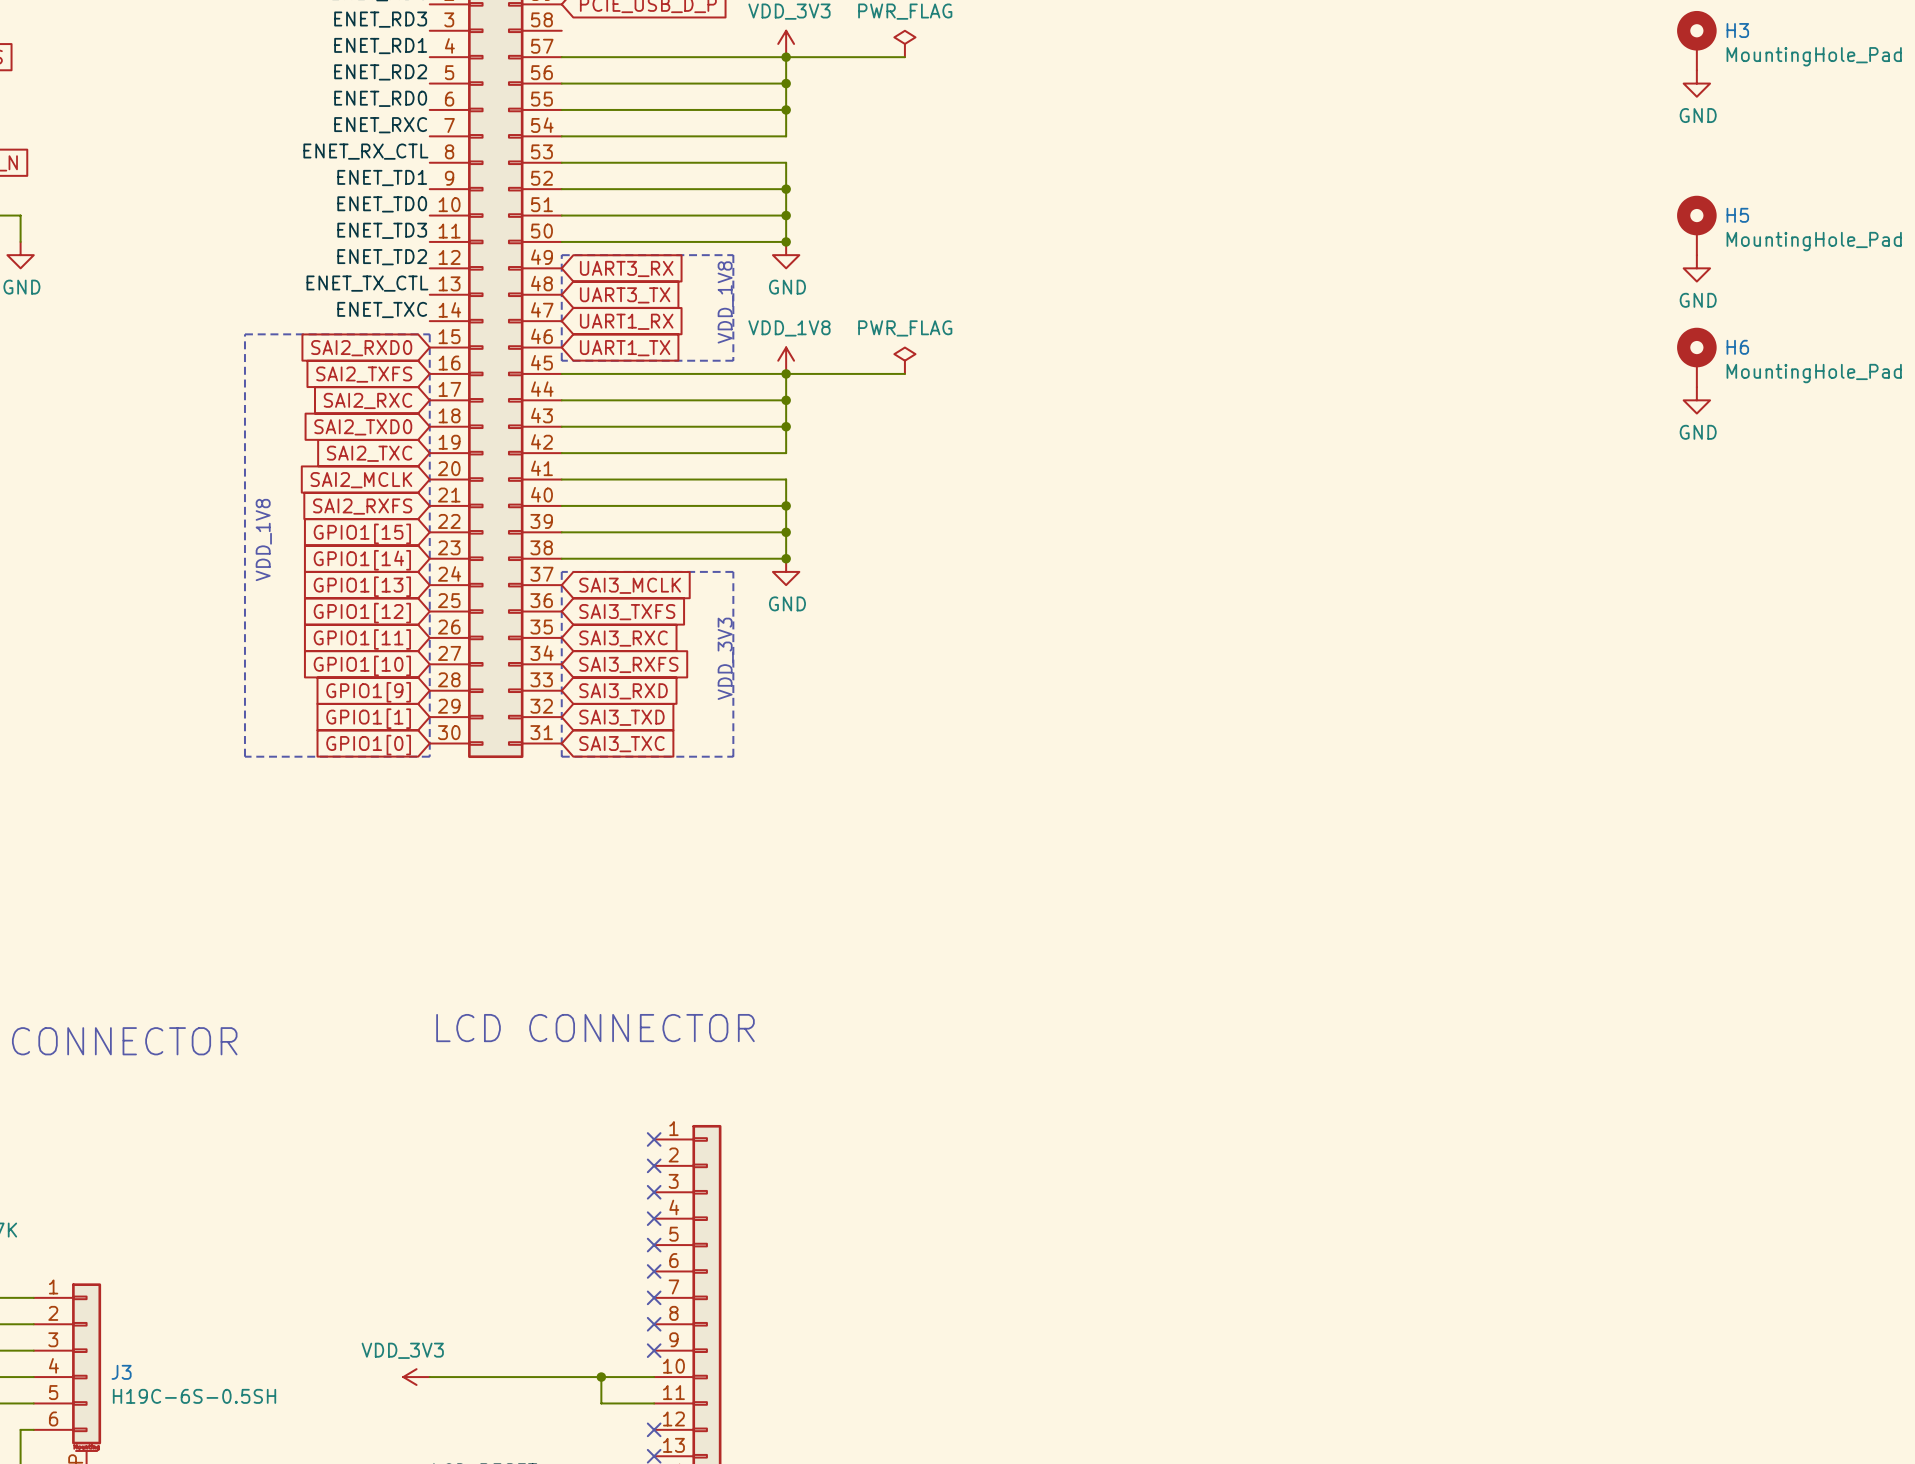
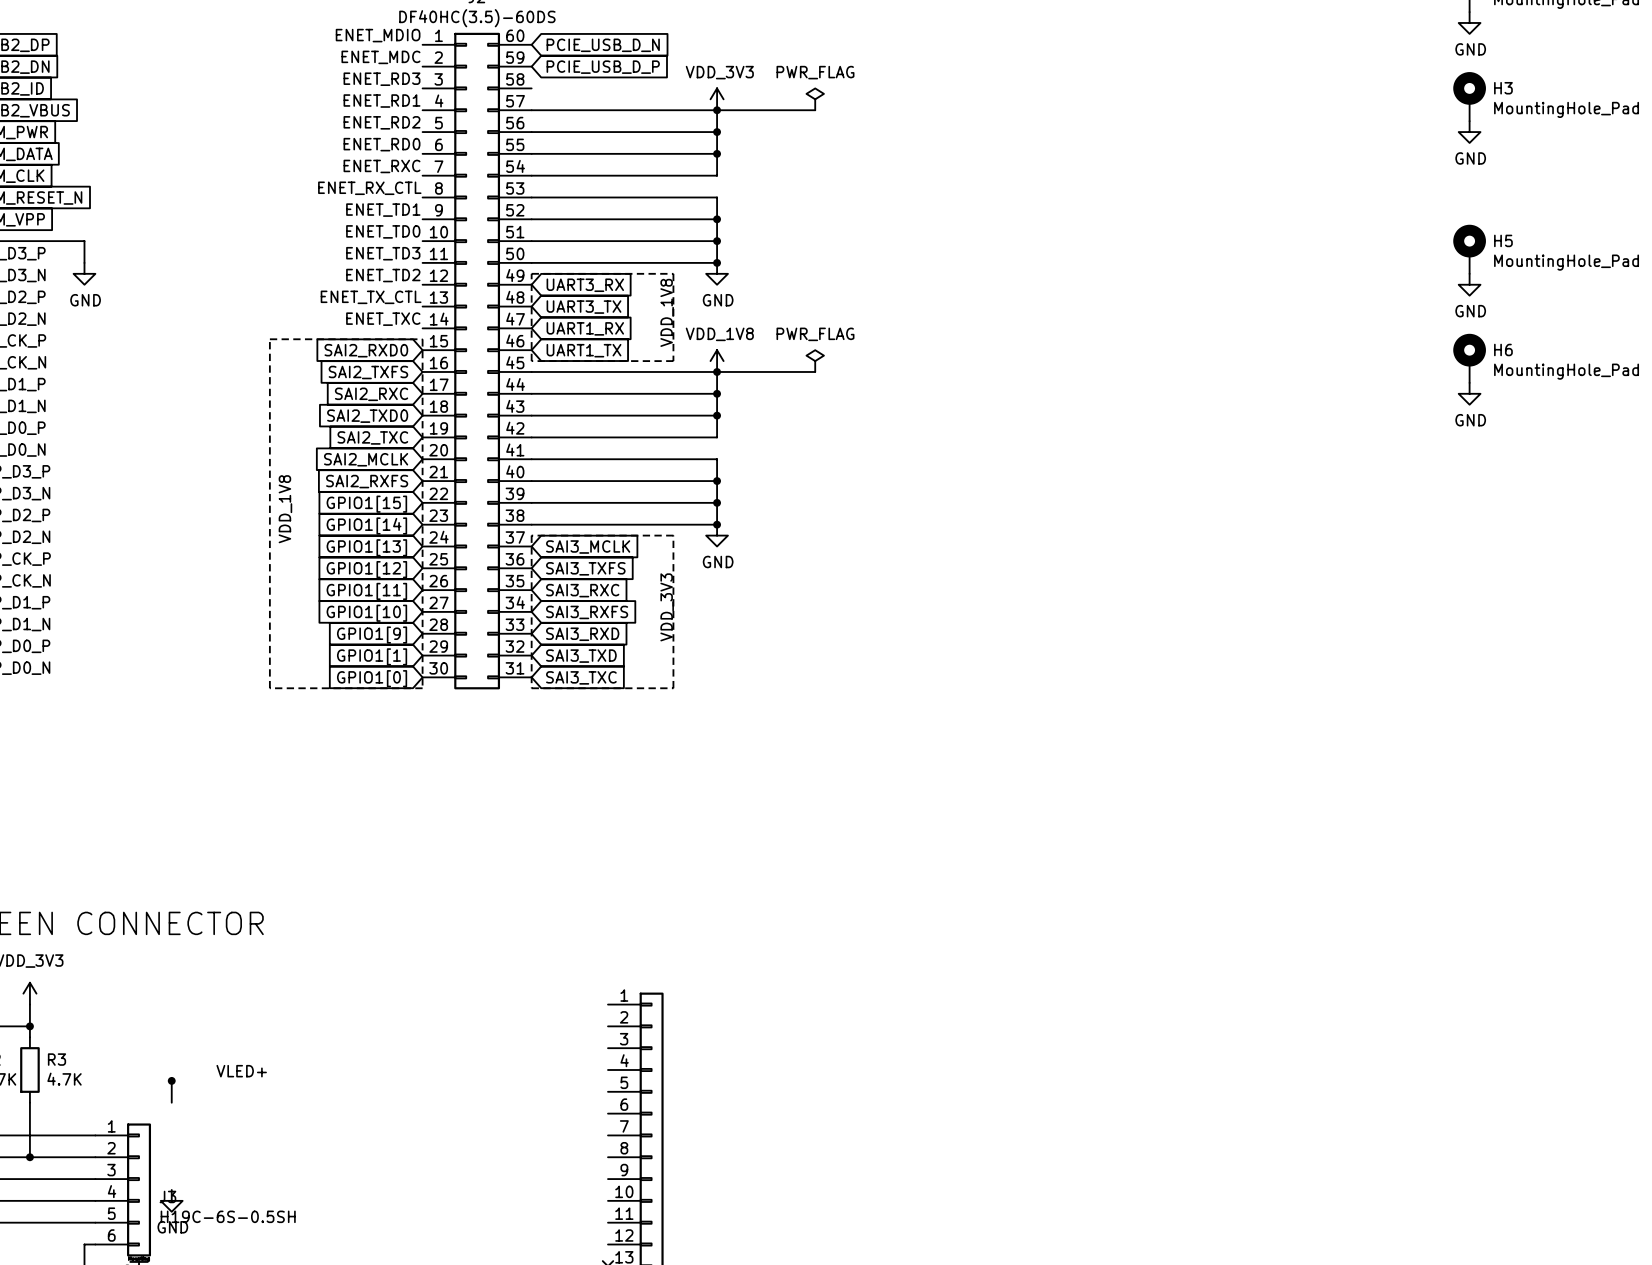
text: LCD CONNECTOR (595, 1028) -> none
no-connect mark: (654, 1139) -> none
no-connect mark: (654, 1165) -> none
no-connect mark: (654, 1192) -> none
no-connect mark: (654, 1218) -> none
label: none -> VLED+ (241, 1071)
wire: none -> (171, 1080) (171, 1102)
junction: none -> (171, 1080)
no-connect mark: (654, 1245) -> none
no-connect mark: (654, 1271) -> none
no-connect mark: (654, 1297) -> none
no-connect mark: (654, 1324) -> none
no-connect mark: (654, 1350) -> none
power symbol: none -> GND (171, 1200)
power symbol: VDD_3V3 (416, 1377) -> none
wire: (429, 1377) (654, 1377) -> none
wire: (601, 1377) (601, 1403) (654, 1403) -> none
junction: (601, 1377) -> none
no-connect mark: (654, 1429) -> none

